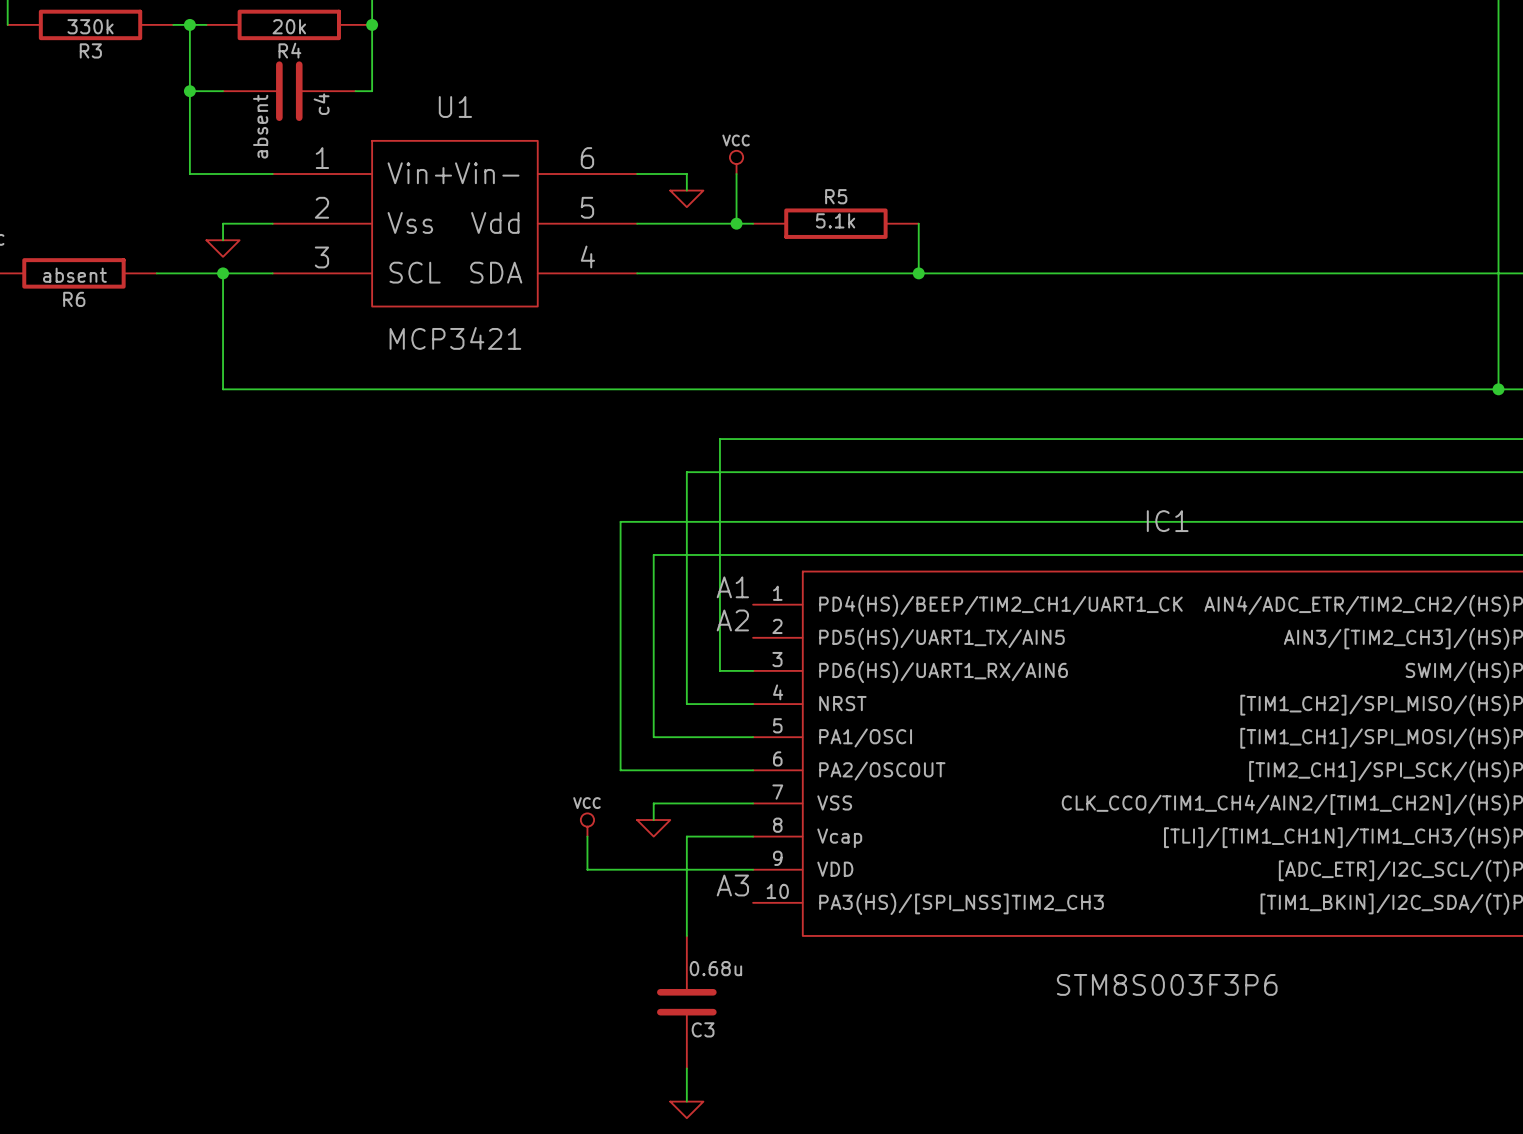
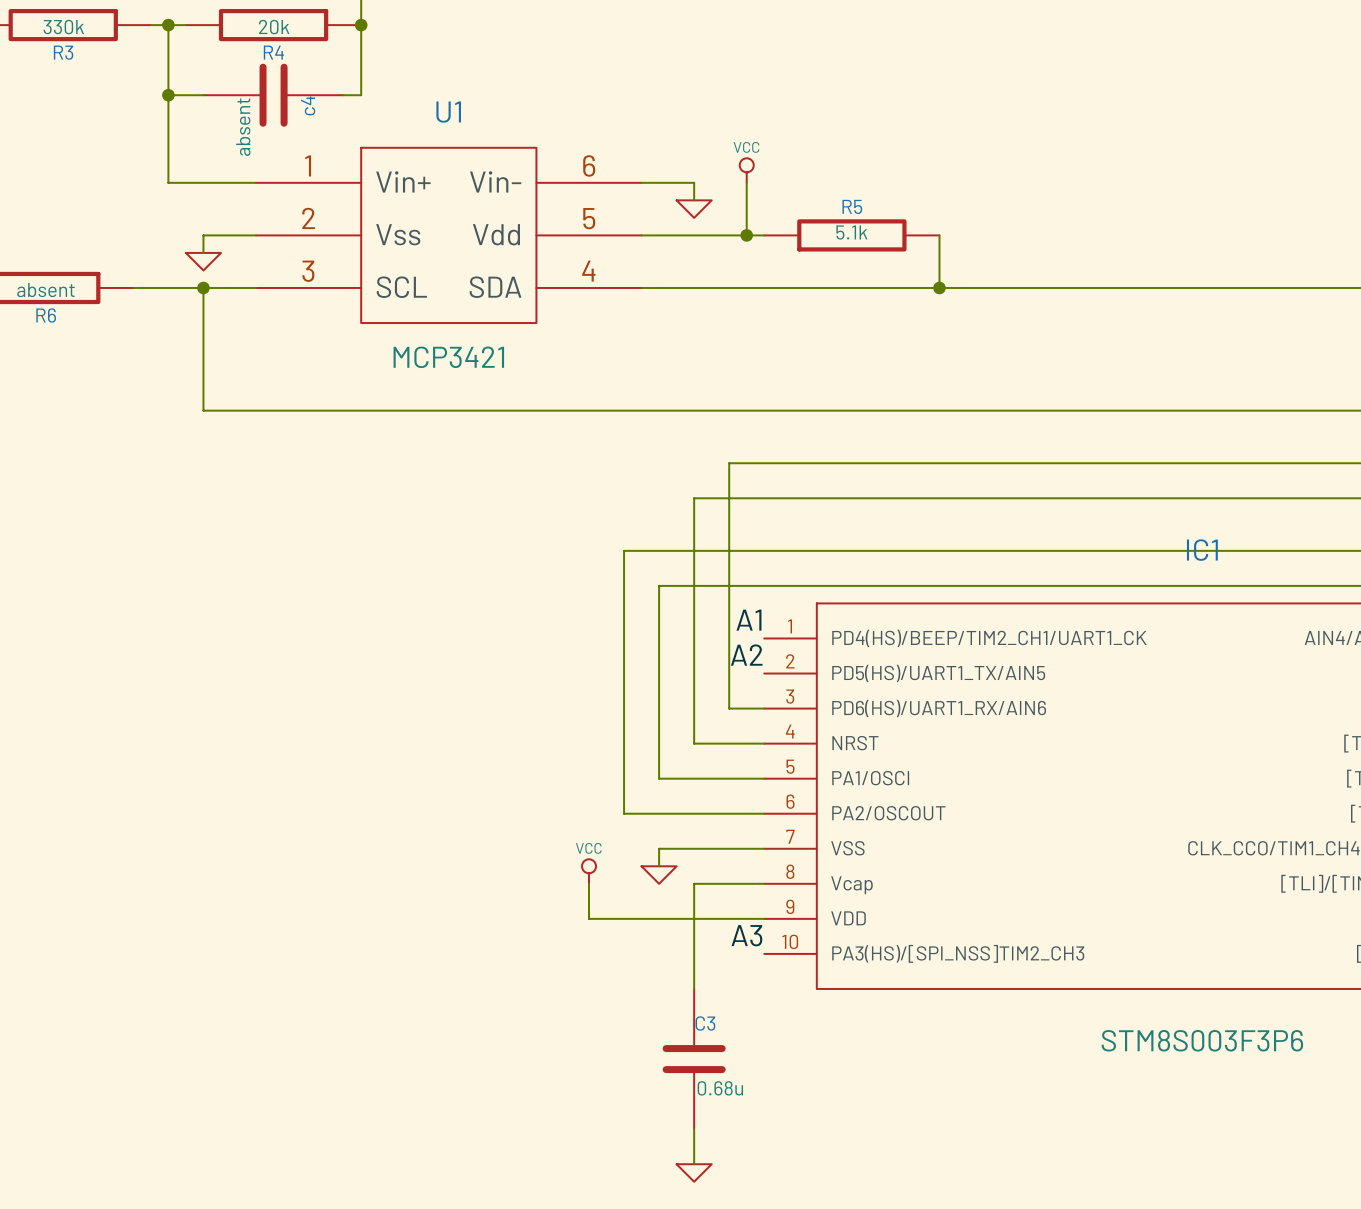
0.68u name: 0.68u (715, 968) -> C3 (705, 1023)
0.68u value: C3 (703, 1029) -> 0.68u (720, 1088)

